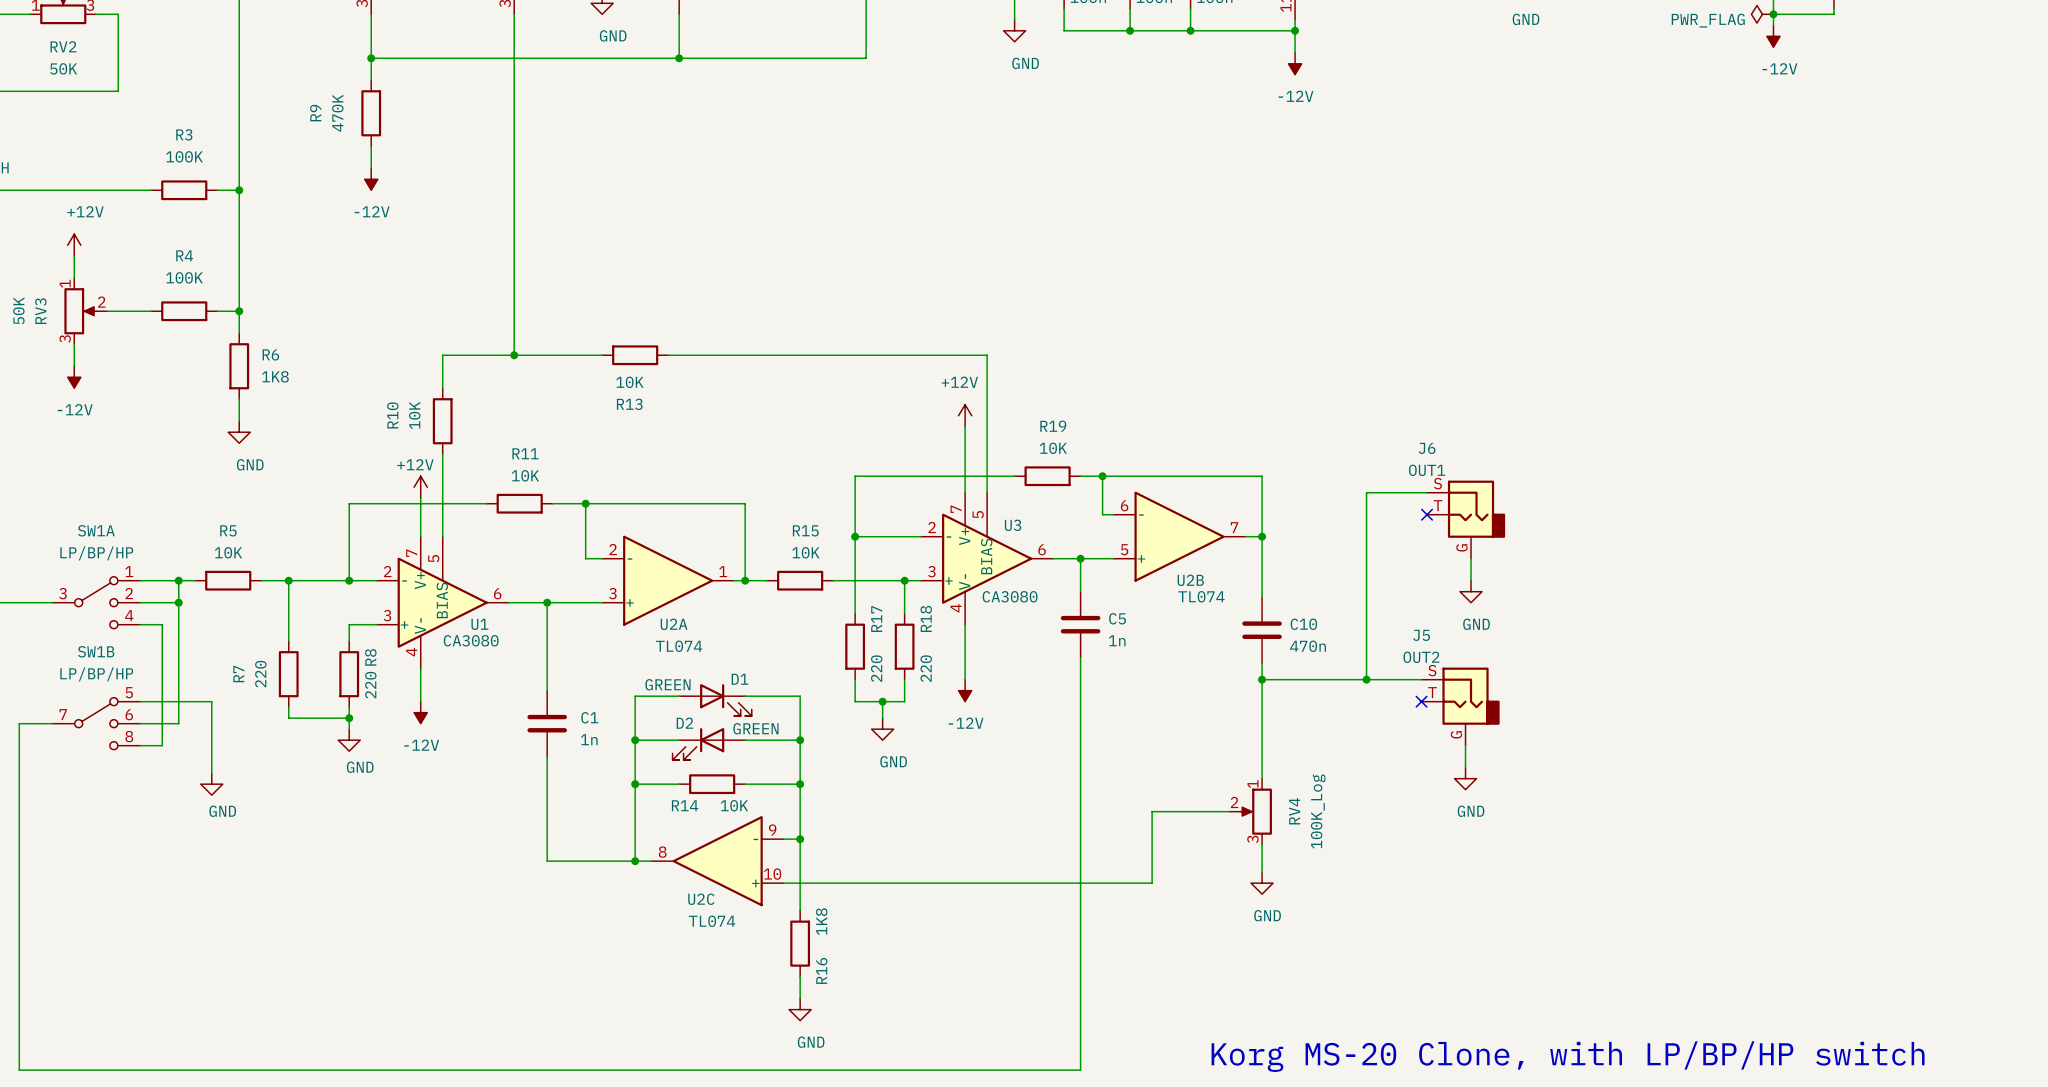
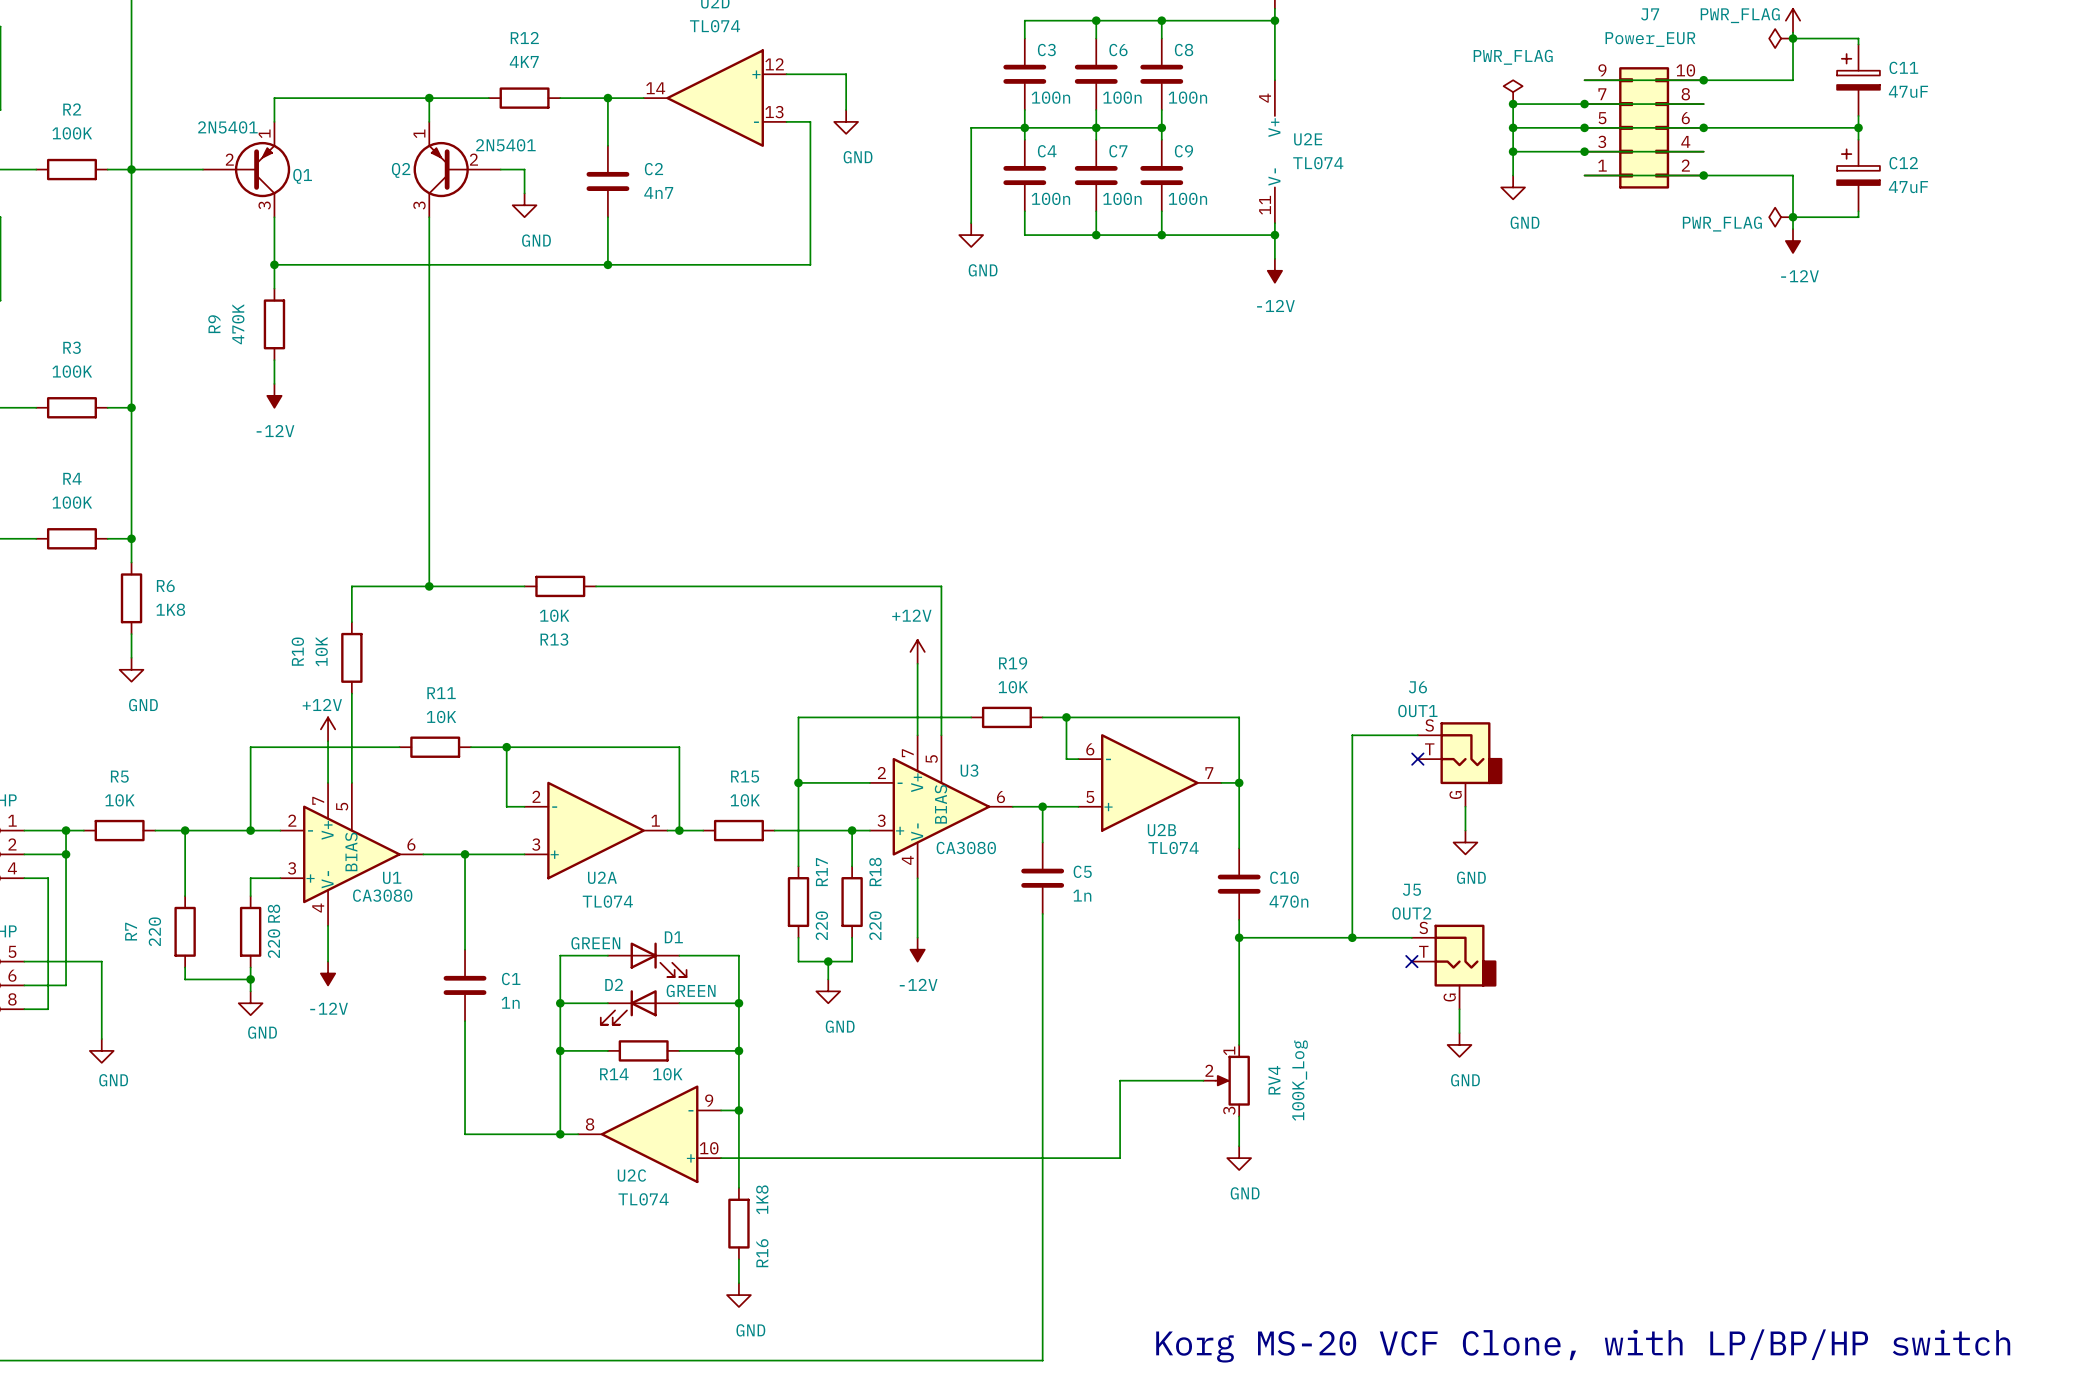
text: Korg MS-20 Clone, with LP/BP/HP switch (1568, 1056) -> Korg MS-20 VCF Clone, with LP/BP/HP switch (1583, 1345)

